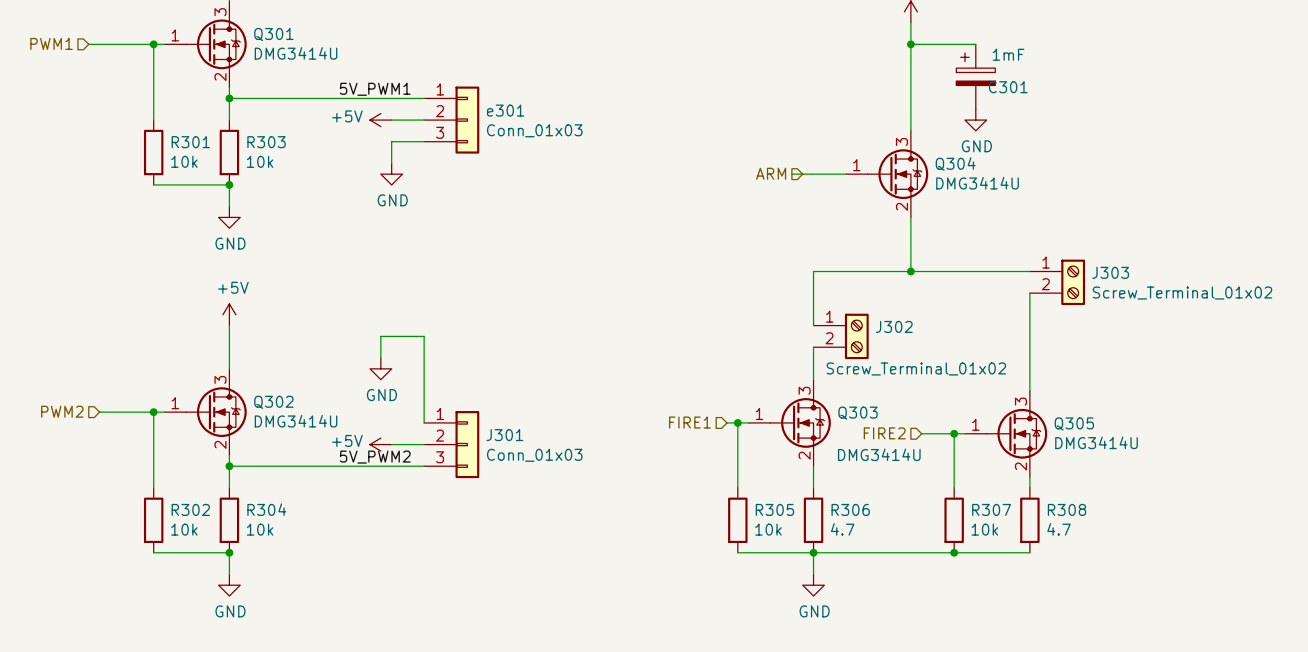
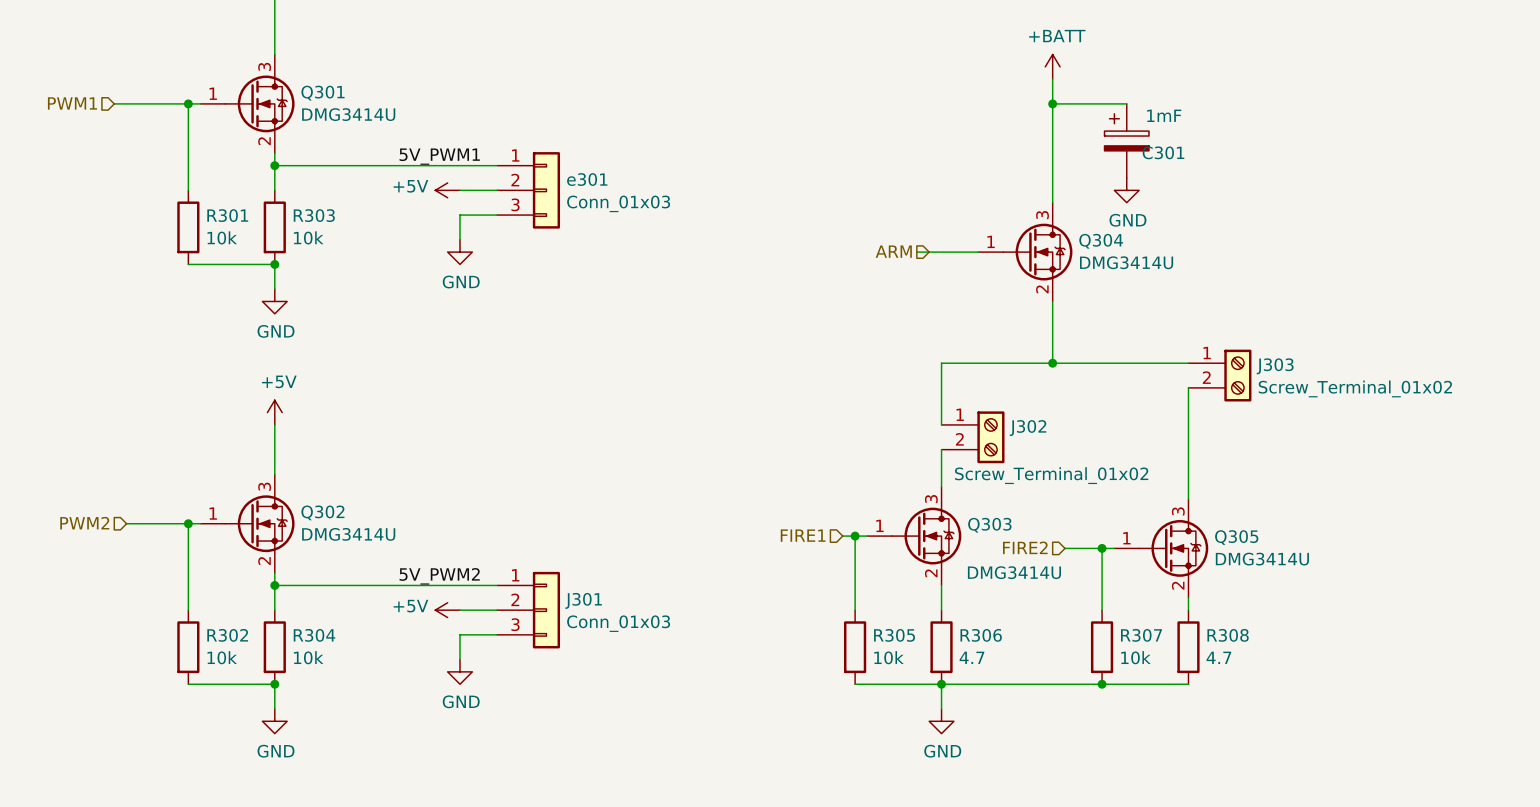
wire: (380, 358) (380, 336) (424, 336) (424, 422) -> none
power symbol position: GND (380, 368) -> GND (460, 671)
power symbol position: +5V (380, 444) -> +5V (447, 610)
wire: (391, 444) (424, 444) -> (460, 610) (497, 610)
J301 position: (451, 444) -> (528, 610)
wire: none -> (497, 634) (460, 634) (460, 659)

